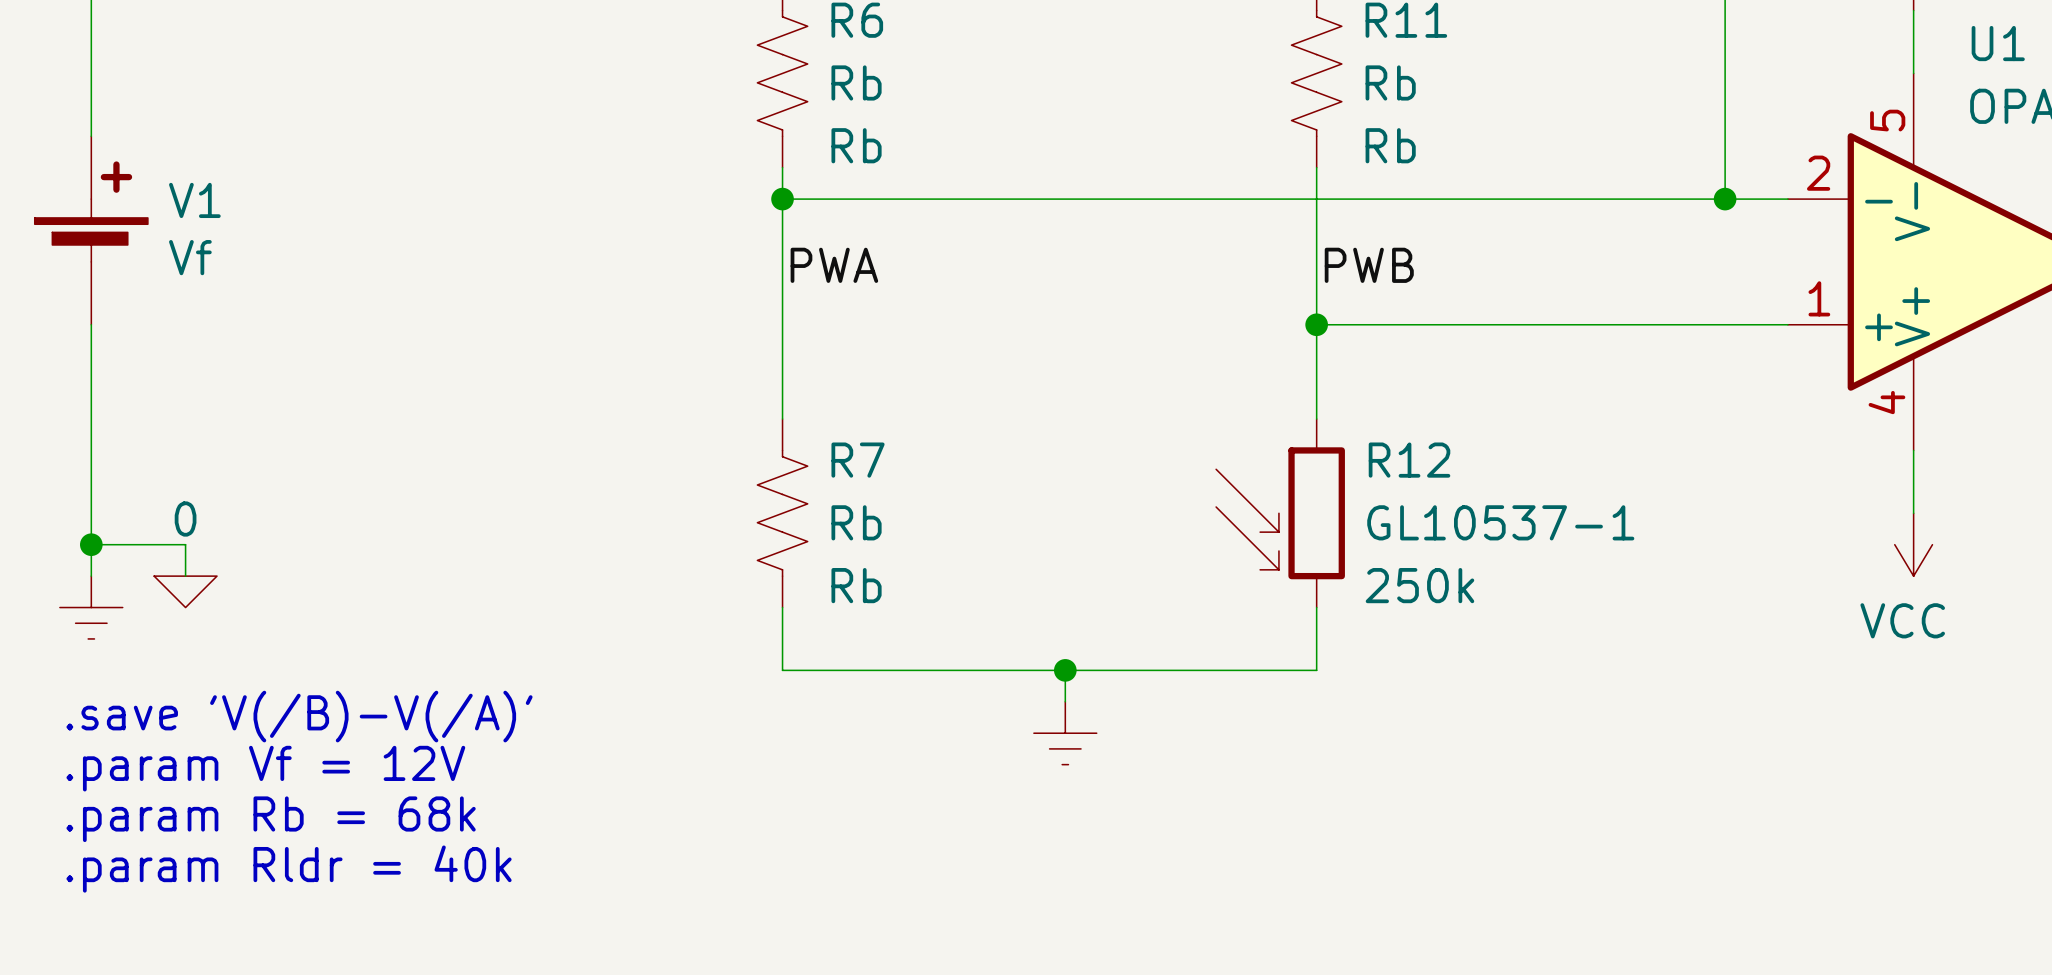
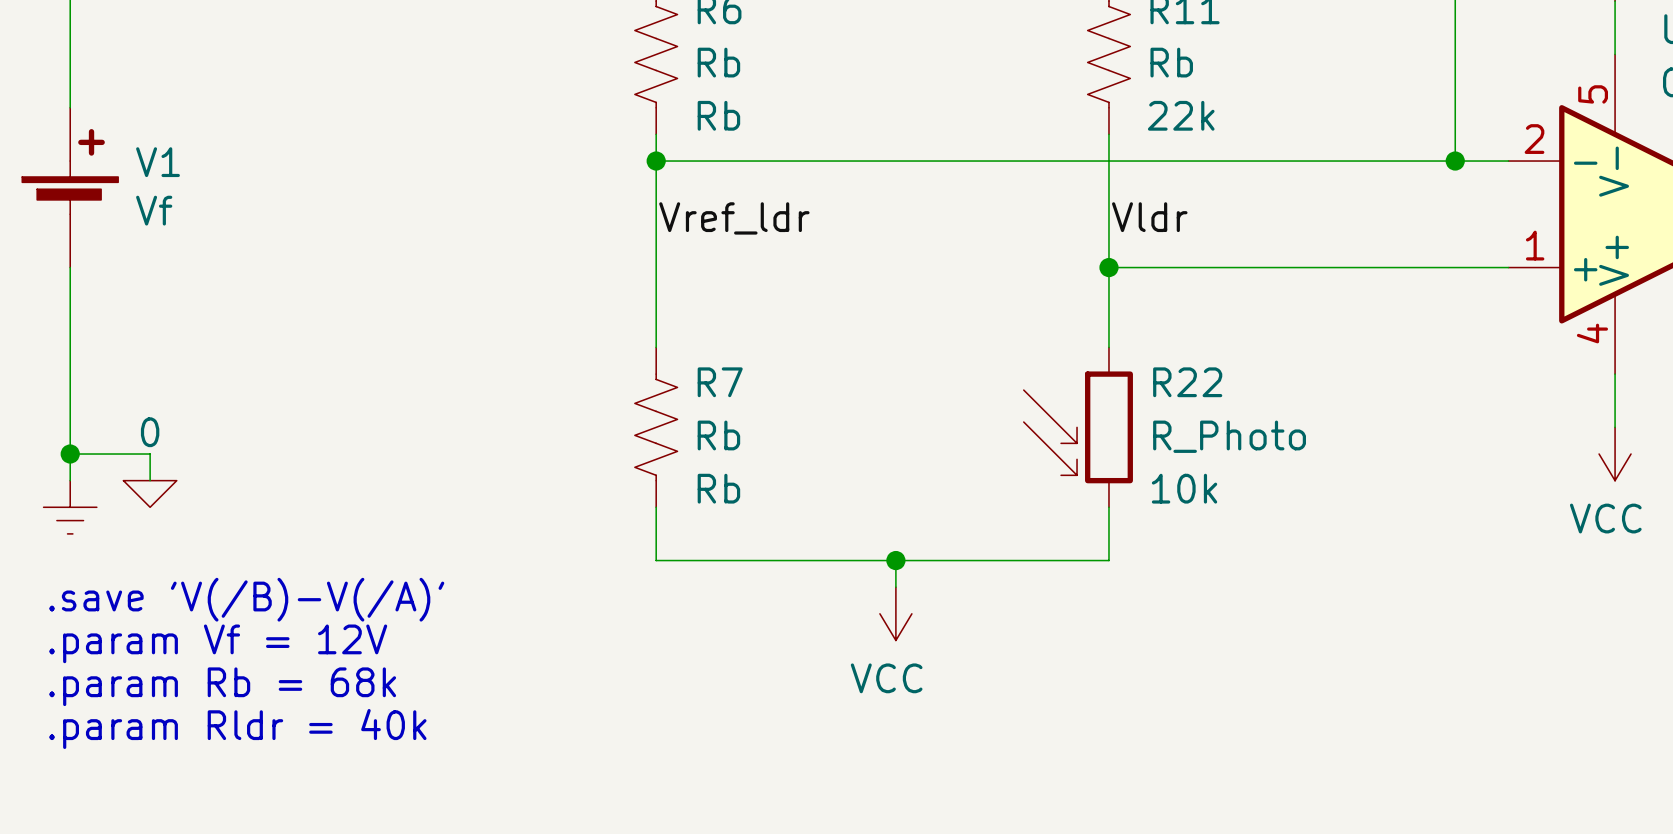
R11 text: Rb (1390, 145) -> 22k (1181, 115)
label: PWA (834, 265) -> Vref_ldr (734, 218)
label: PWB (1369, 265) -> Vldr (1149, 217)
R12 name: R12 (1409, 460) -> R22 (1187, 382)
R12 value: GL10537-1 (1500, 522) -> R_Photo (1229, 436)
R12 text: 250k (1419, 585) -> 10k (1184, 488)
power symbol shape: [1033, 701, 1097, 765] -> [879, 587, 912, 641]
power symbol text: none -> VCC (886, 678)

